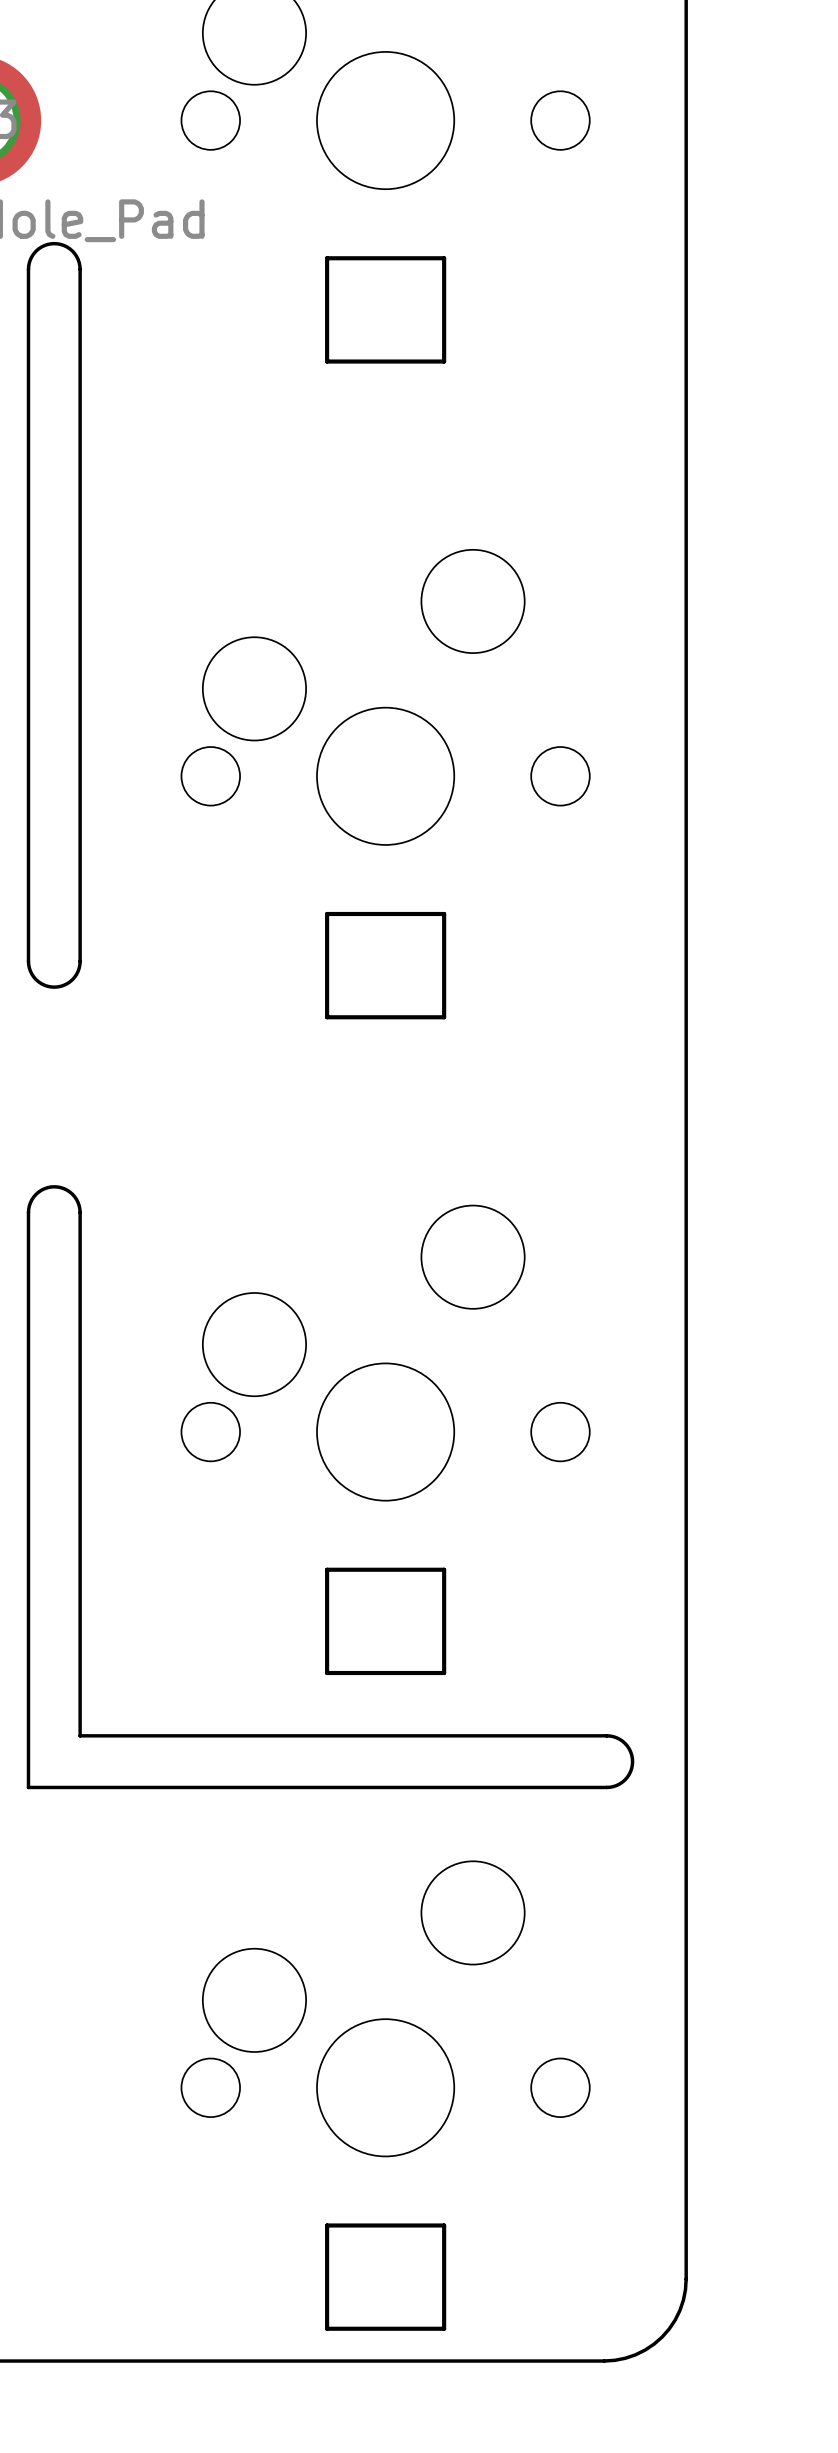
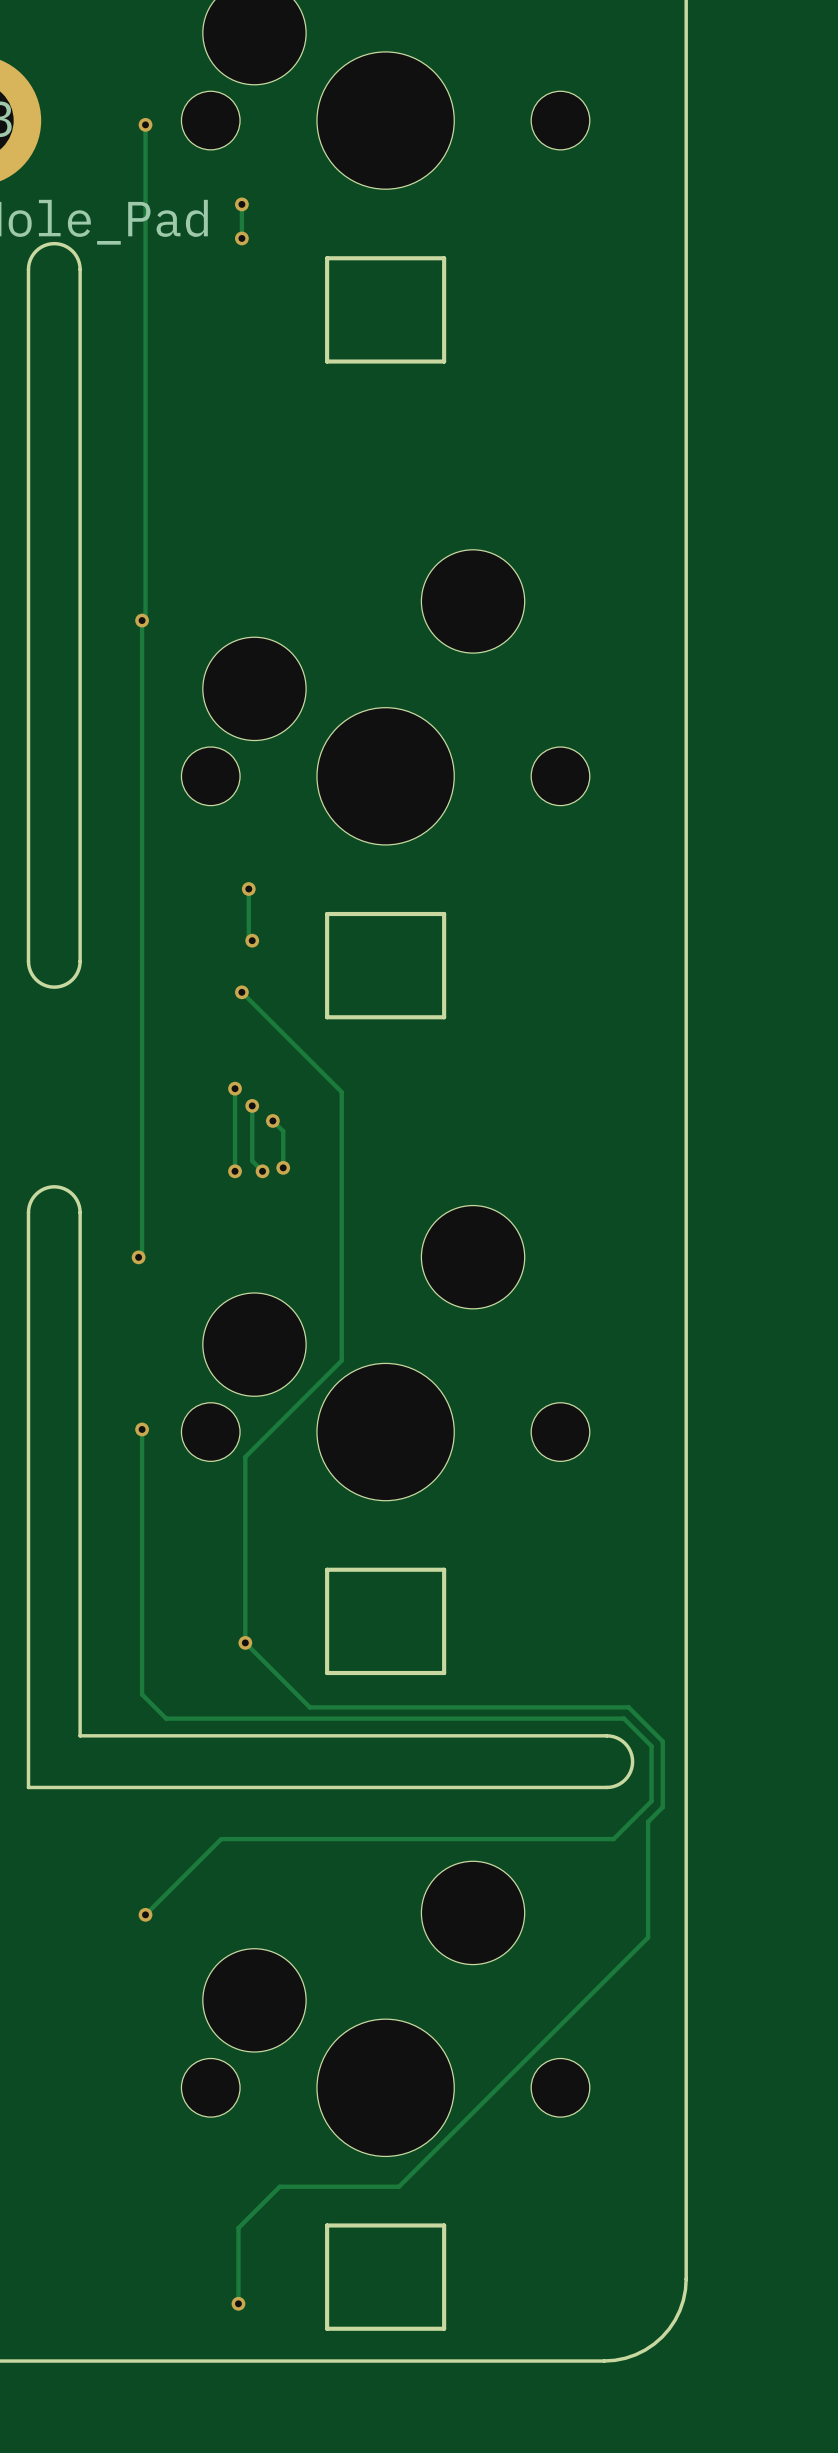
track: none -> (145, 124) (145, 617) (142, 620) (142, 1253) (138, 1257)
via: none -> (145, 124)
track: none -> (241, 204) (241, 238)
via: none -> (241, 204)
via: none -> (241, 238)
via: none -> (142, 620)
track: none -> (248, 889) (248, 937) (252, 940)
via: none -> (248, 889)
via: none -> (252, 940)
track: none -> (241, 992) (341, 1092) (341, 1360) (245, 1457) (245, 1642) (309, 1707) (628, 1707) (662, 1741) (662, 1807) (648, 1821) (648, 1937) (398, 2186) (279, 2186) (238, 2228) (238, 2303)
via: none -> (241, 992)
track: none -> (235, 1088) (235, 1171)
via: none -> (235, 1088)
track: none -> (252, 1105) (252, 1160) (262, 1171)
via: none -> (252, 1105)
track: none -> (272, 1120) (283, 1131) (283, 1167)
via: none -> (272, 1120)
via: none -> (283, 1167)
via: none -> (235, 1171)
via: none -> (262, 1171)
via: none -> (138, 1257)
track: none -> (142, 1429) (142, 1694) (166, 1718) (623, 1718) (651, 1746) (651, 1801) (613, 1839) (221, 1839) (145, 1914)
via: none -> (142, 1429)
via: none -> (245, 1642)
via: none -> (145, 1914)
via: none -> (238, 2303)

